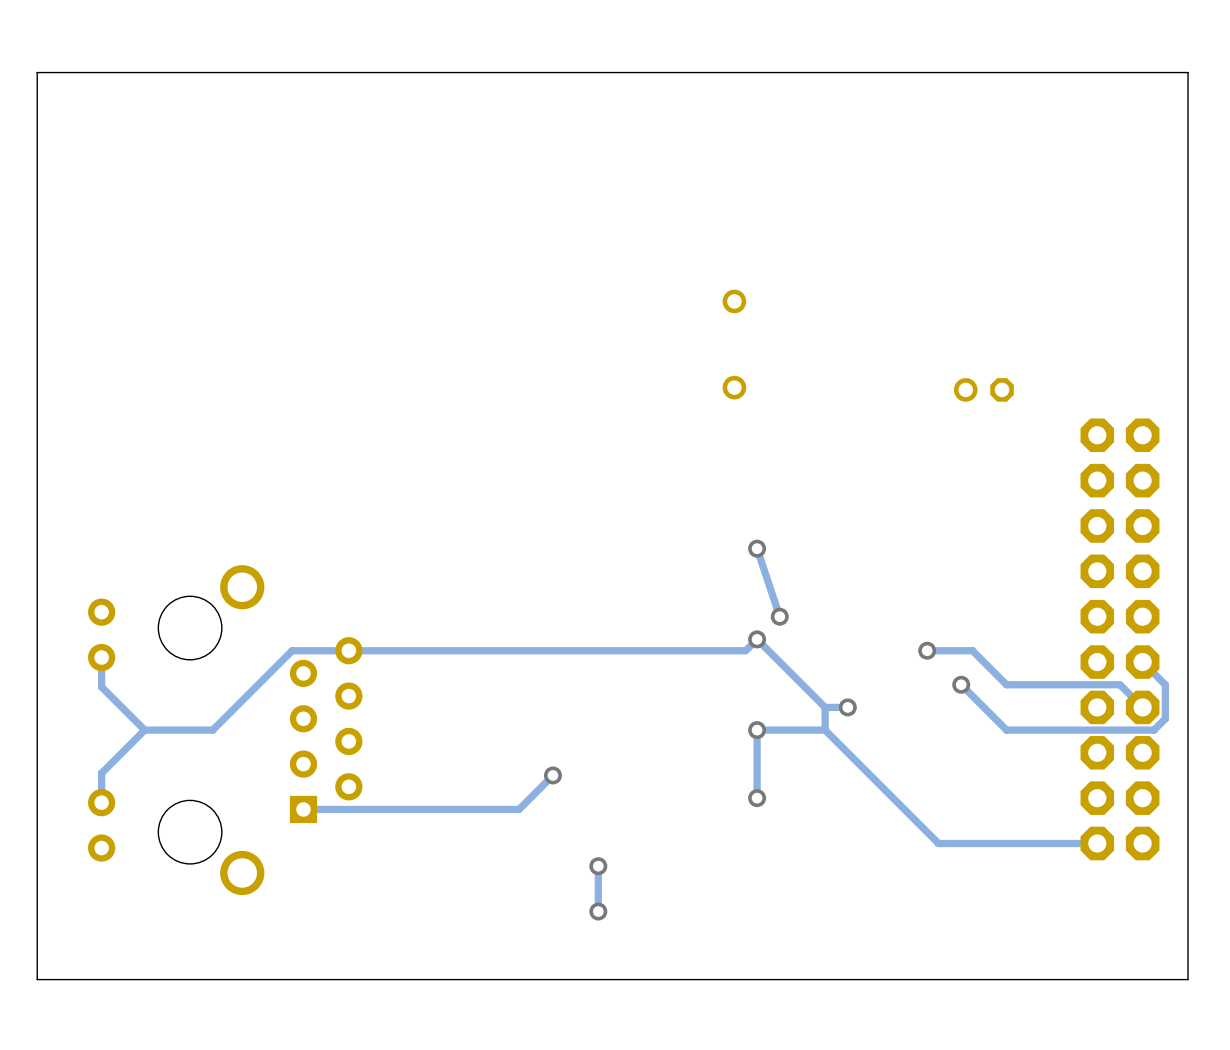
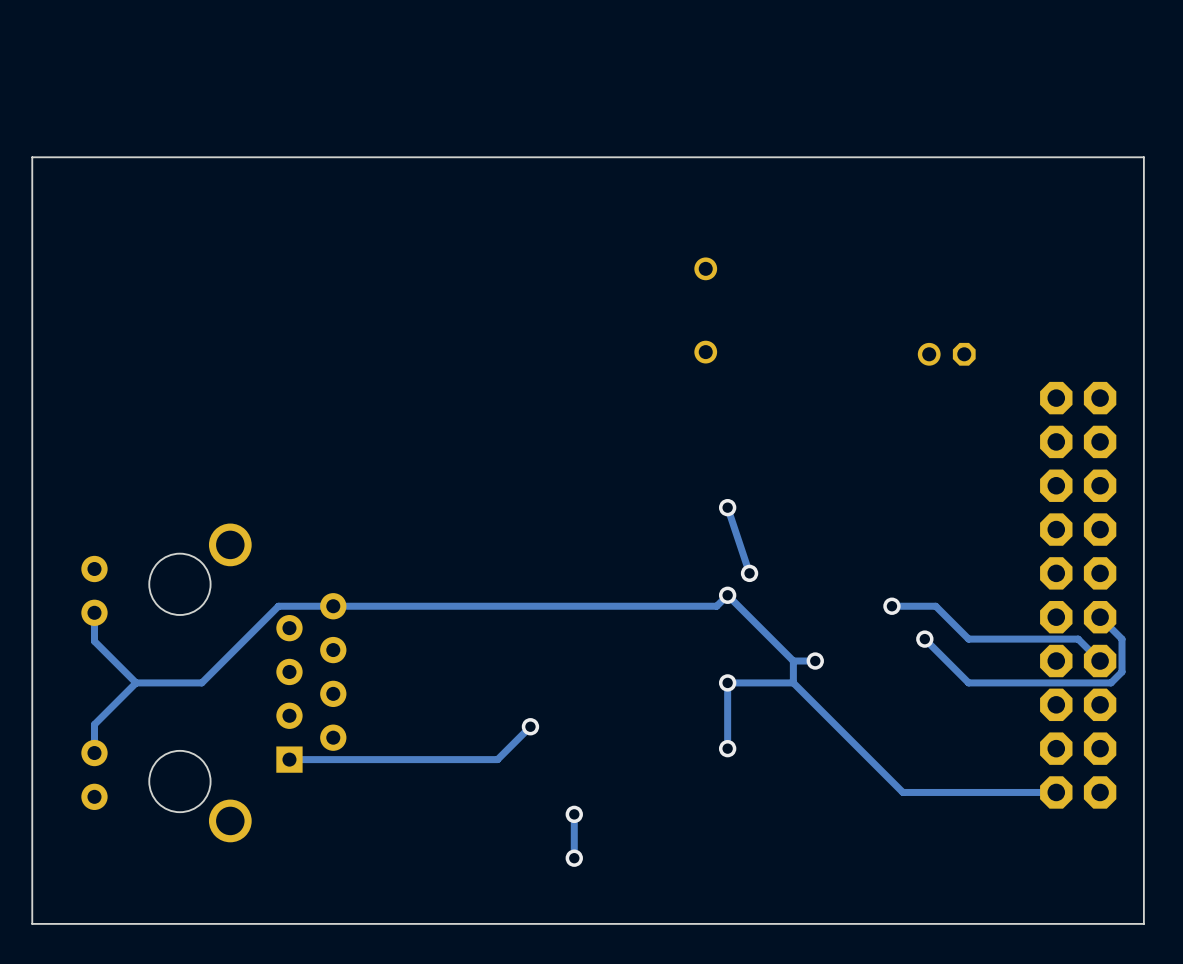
board edge: (1188, 185) (1188, 72) (37, 72) (37, 185) -> (1143, 157) (32, 157)

